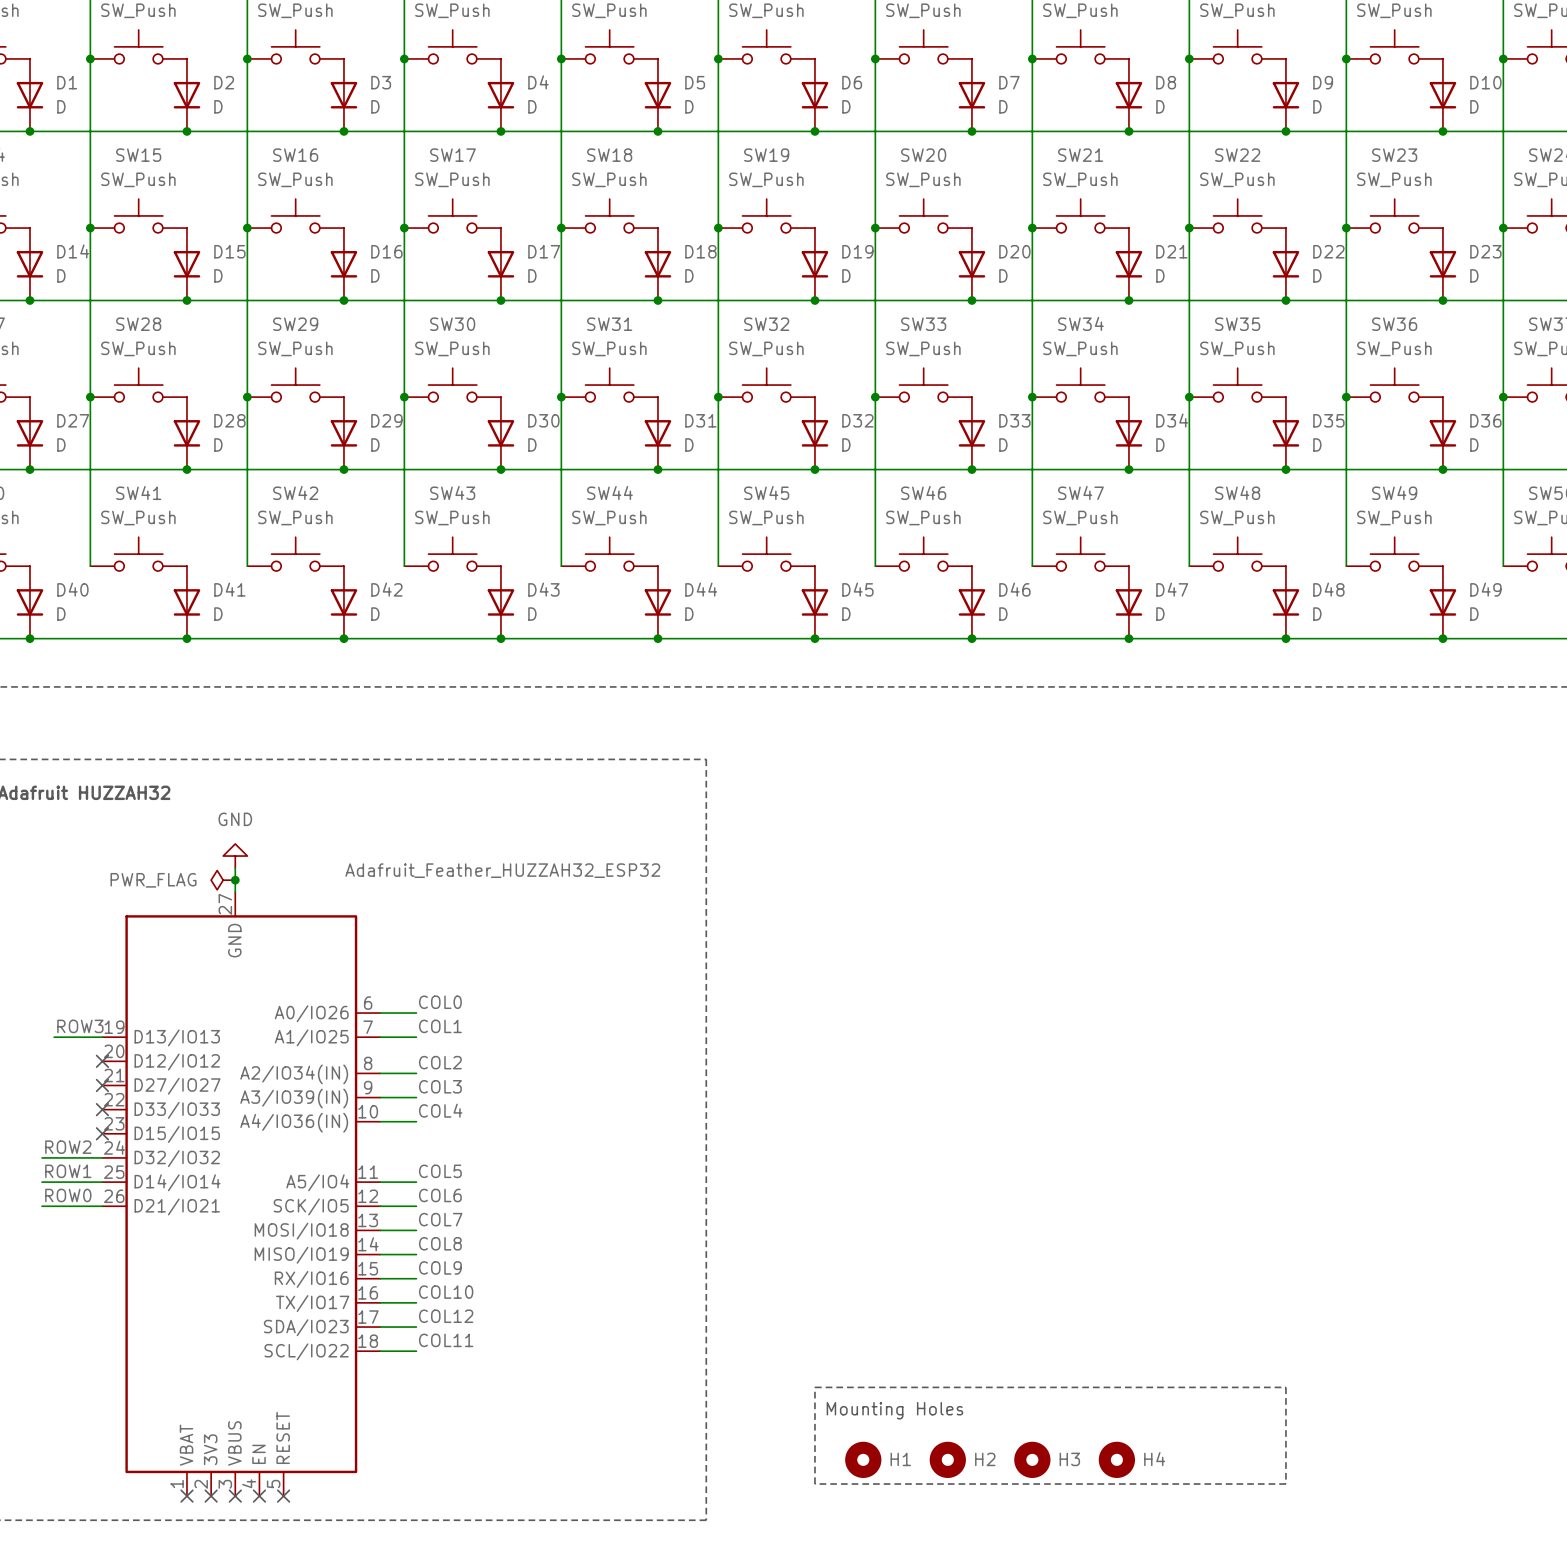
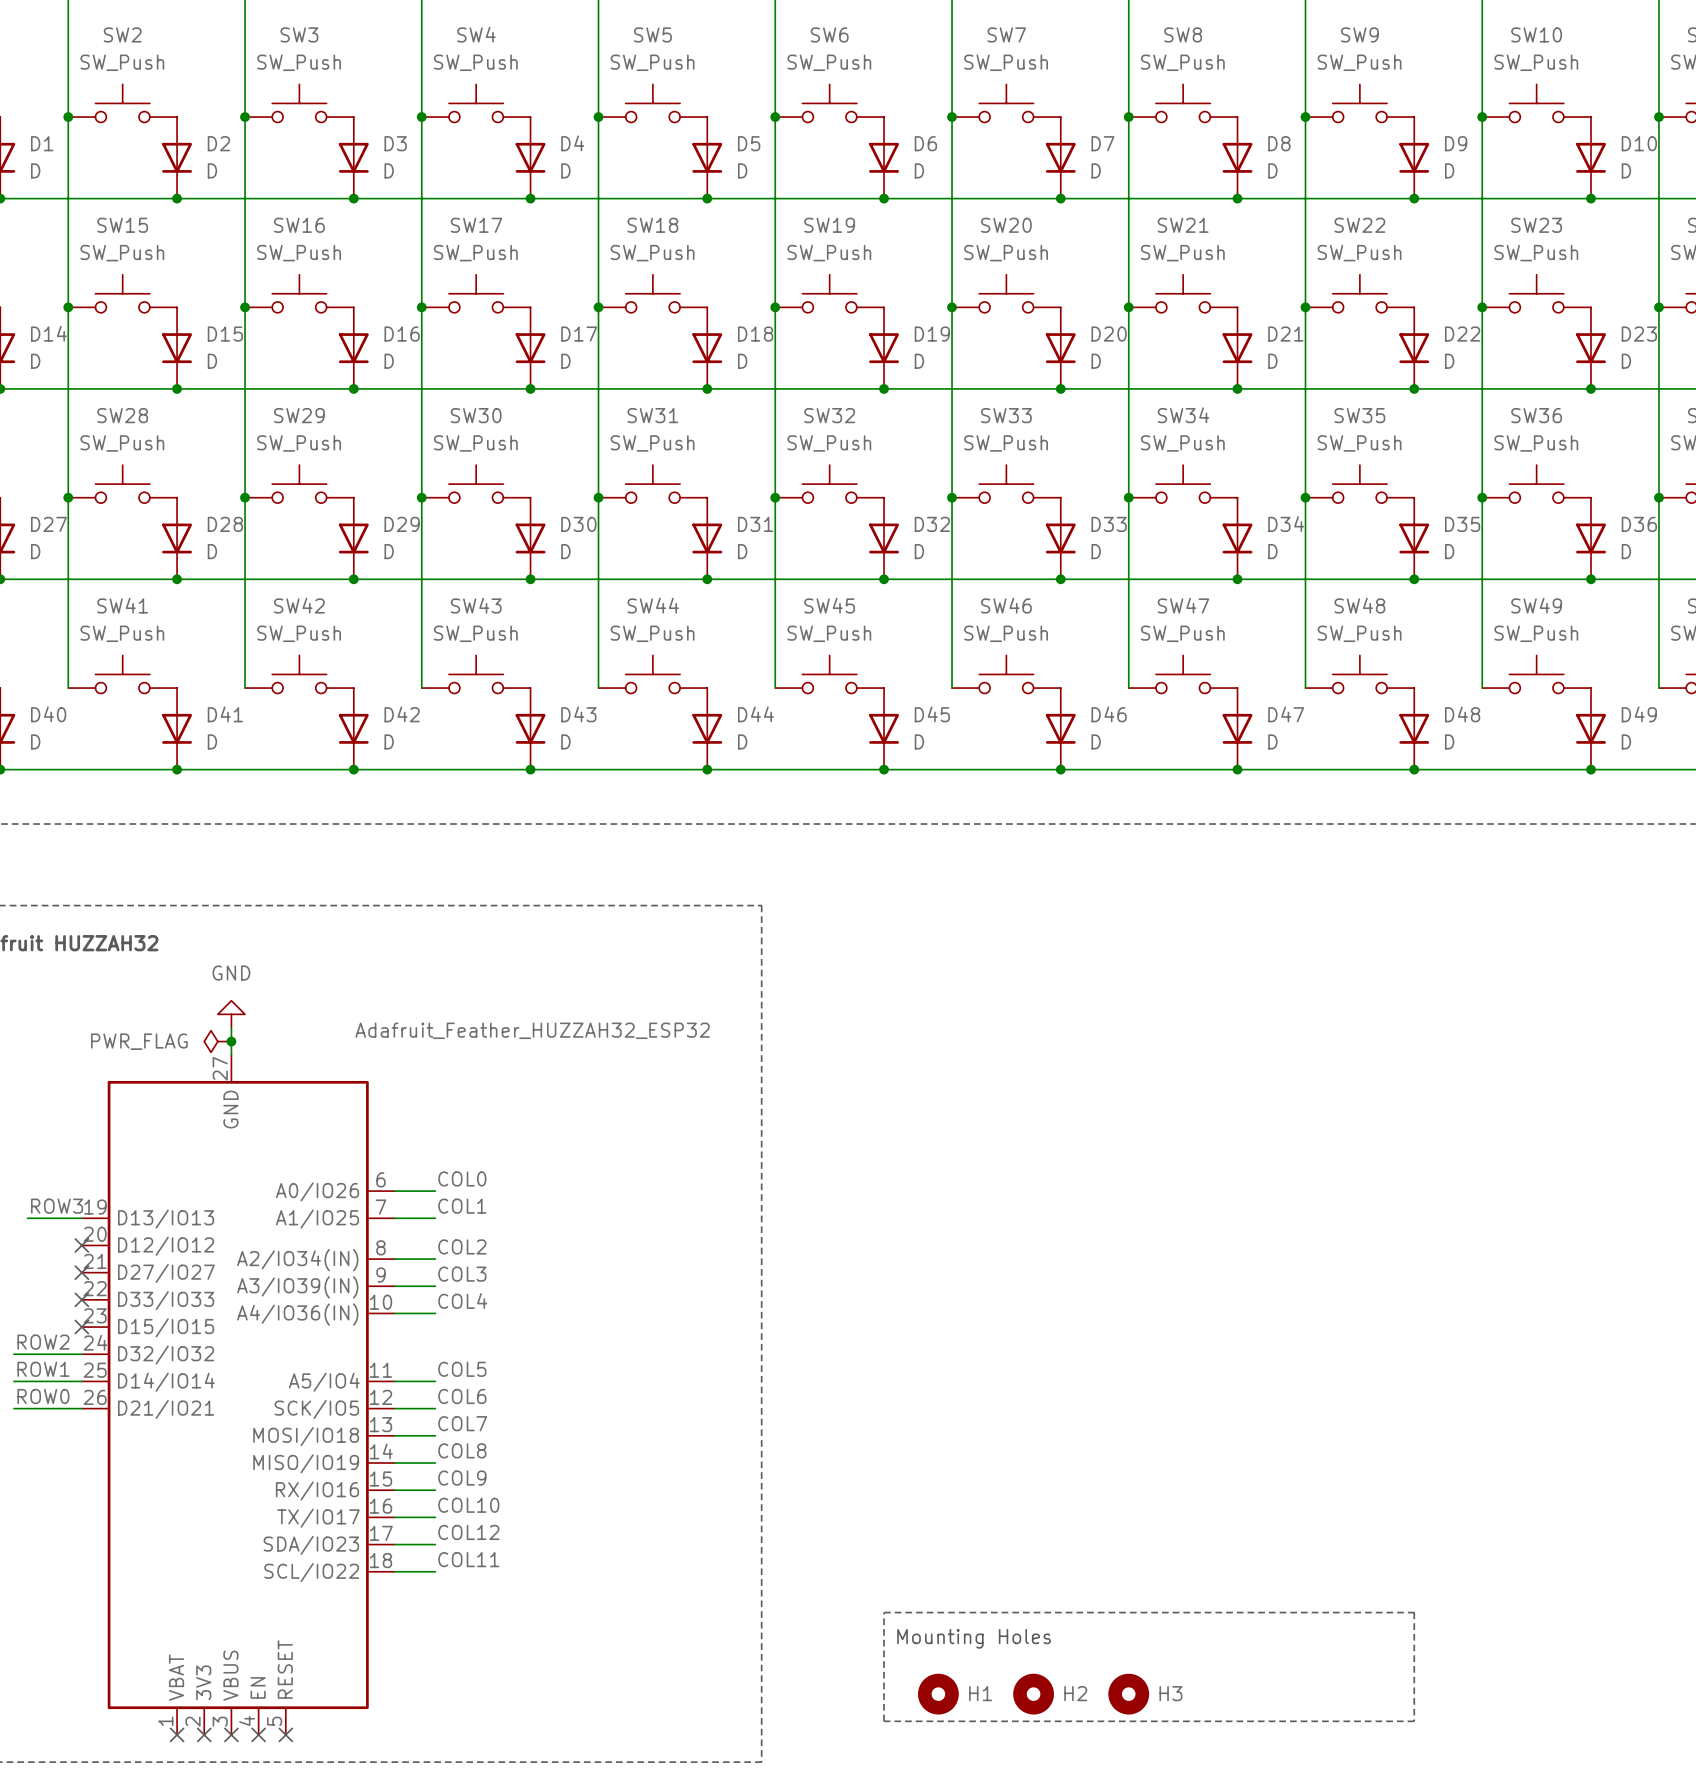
H4: (1116, 1459) -> none

